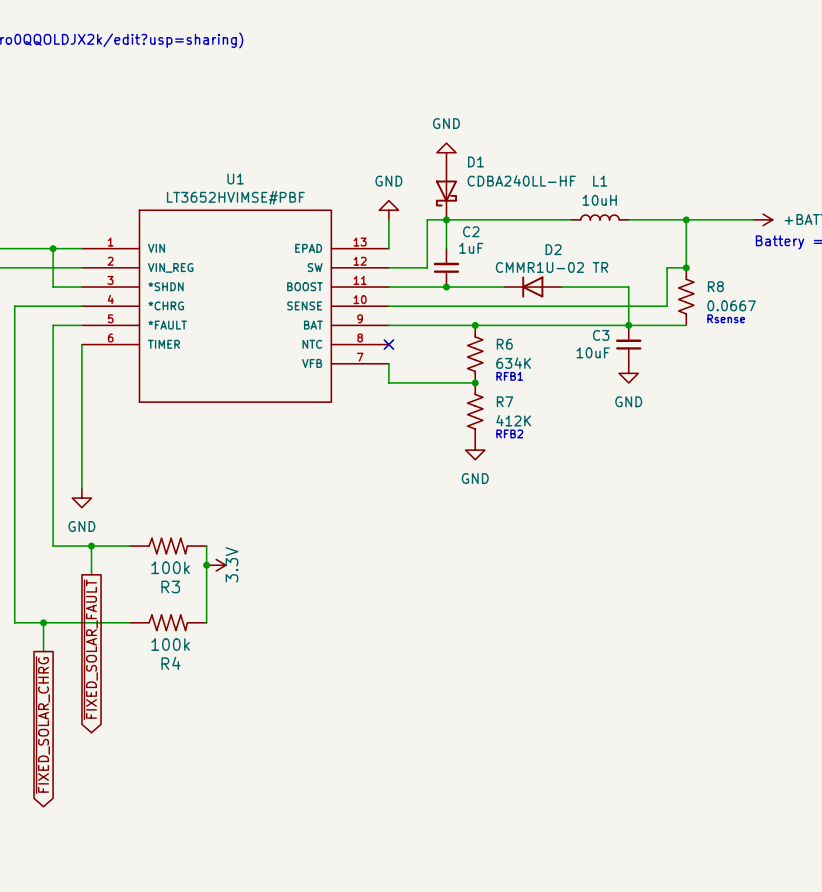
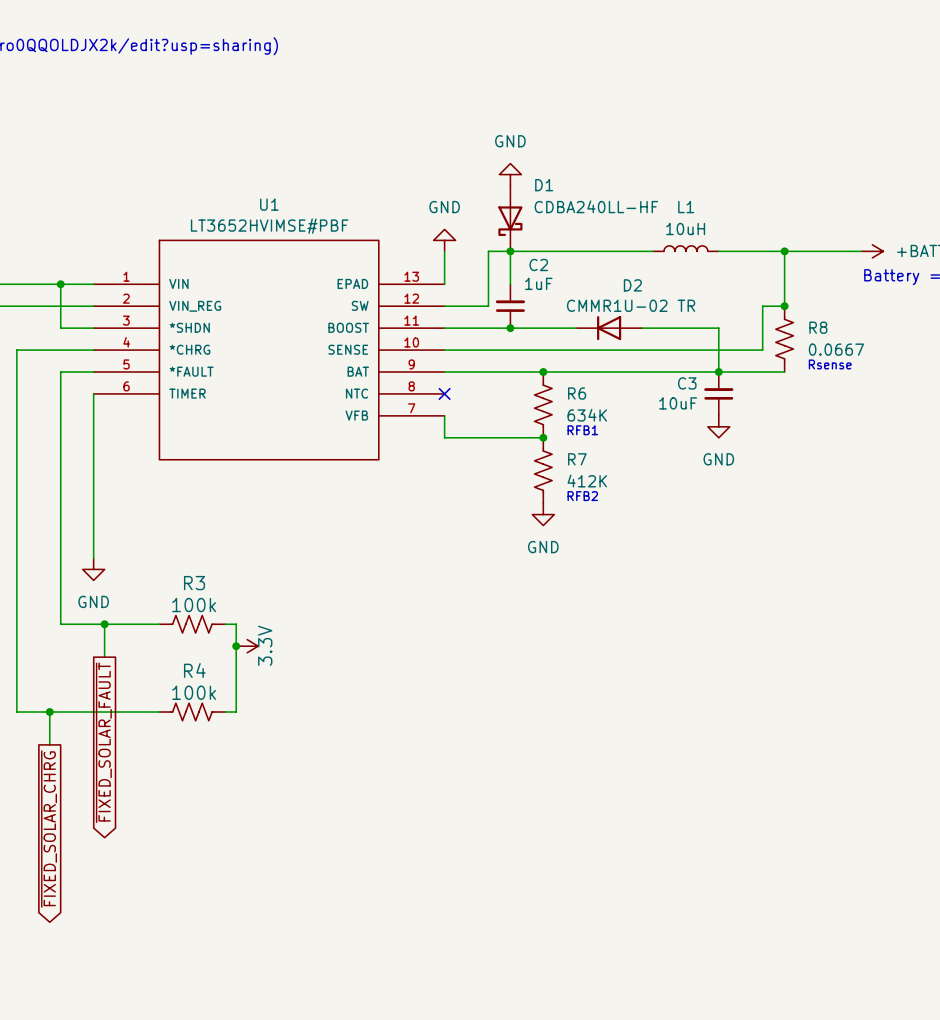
R3 symbol: [129, 538, 207, 554] -> [159, 615, 226, 634]
R3 value position: 100k (170, 567) -> 100k (194, 605)
R3 name position: R3 (170, 586) -> R3 (194, 583)
R4 symbol: [129, 615, 207, 631] -> [159, 703, 226, 721]
R4 value position: 100k (170, 644) -> 100k (194, 692)
R4 name position: R4 (171, 663) -> R4 (194, 670)

